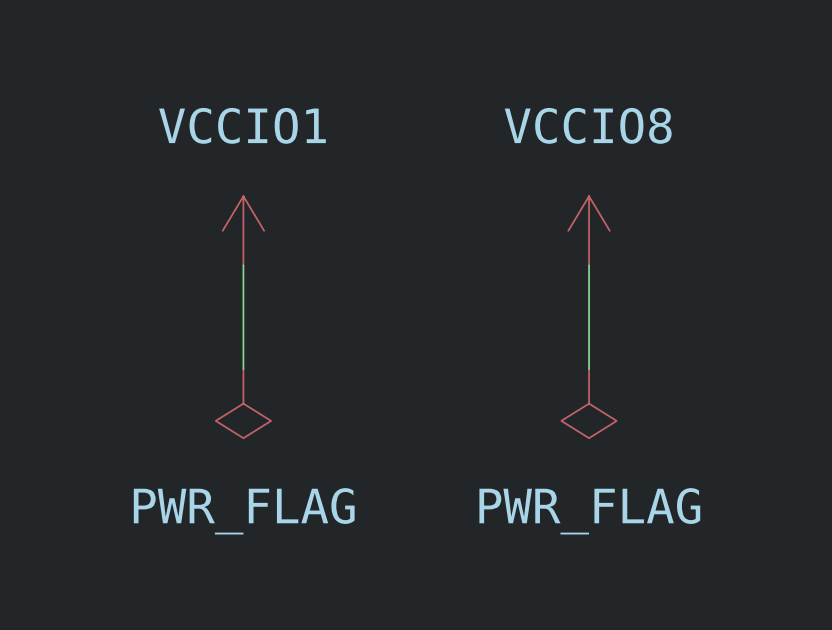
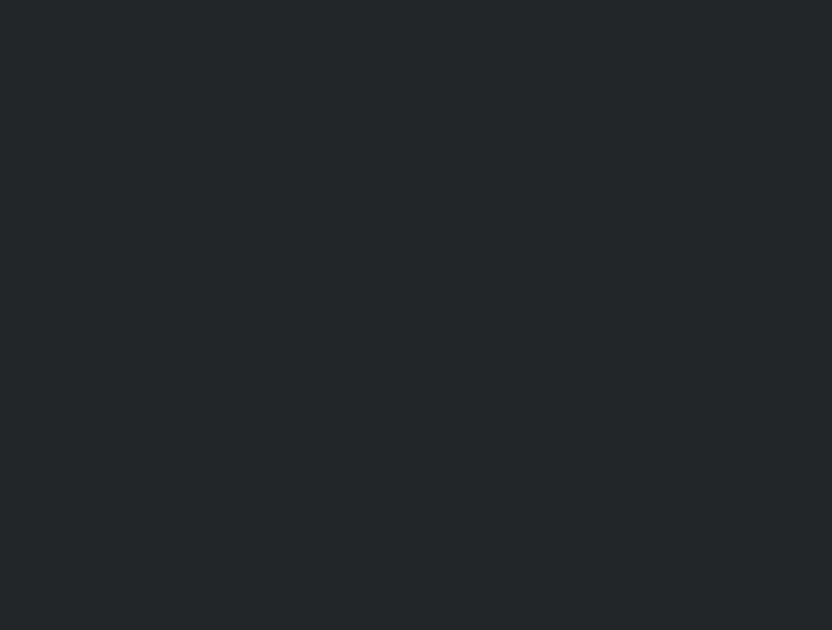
power symbol: VCCIO1 (243, 230) -> none
power symbol: VCCIO8 (589, 230) -> none
wire: (243, 265) (243, 369) -> none
wire: (589, 265) (589, 369) -> none
power symbol: PWR_FLAG (243, 403) -> none
power symbol: PWR_FLAG (589, 403) -> none

